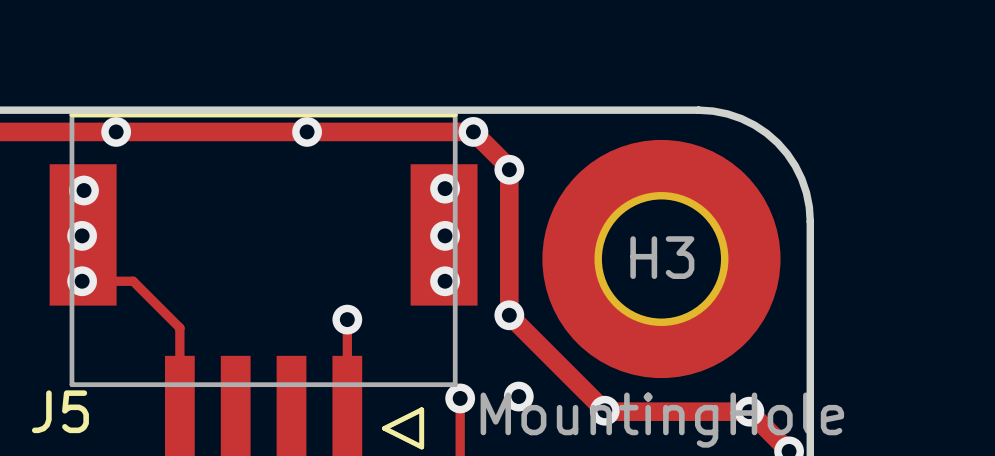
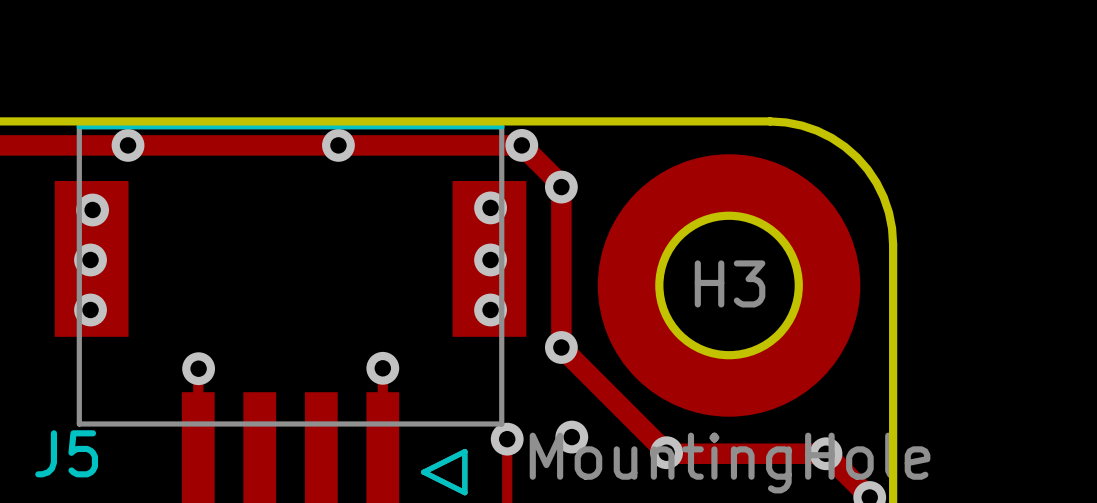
track: (82, 281) (133, 281) (179, 327) (179, 334) -> none
via position: (347, 319) -> (382, 368)
via: none -> (198, 368)

